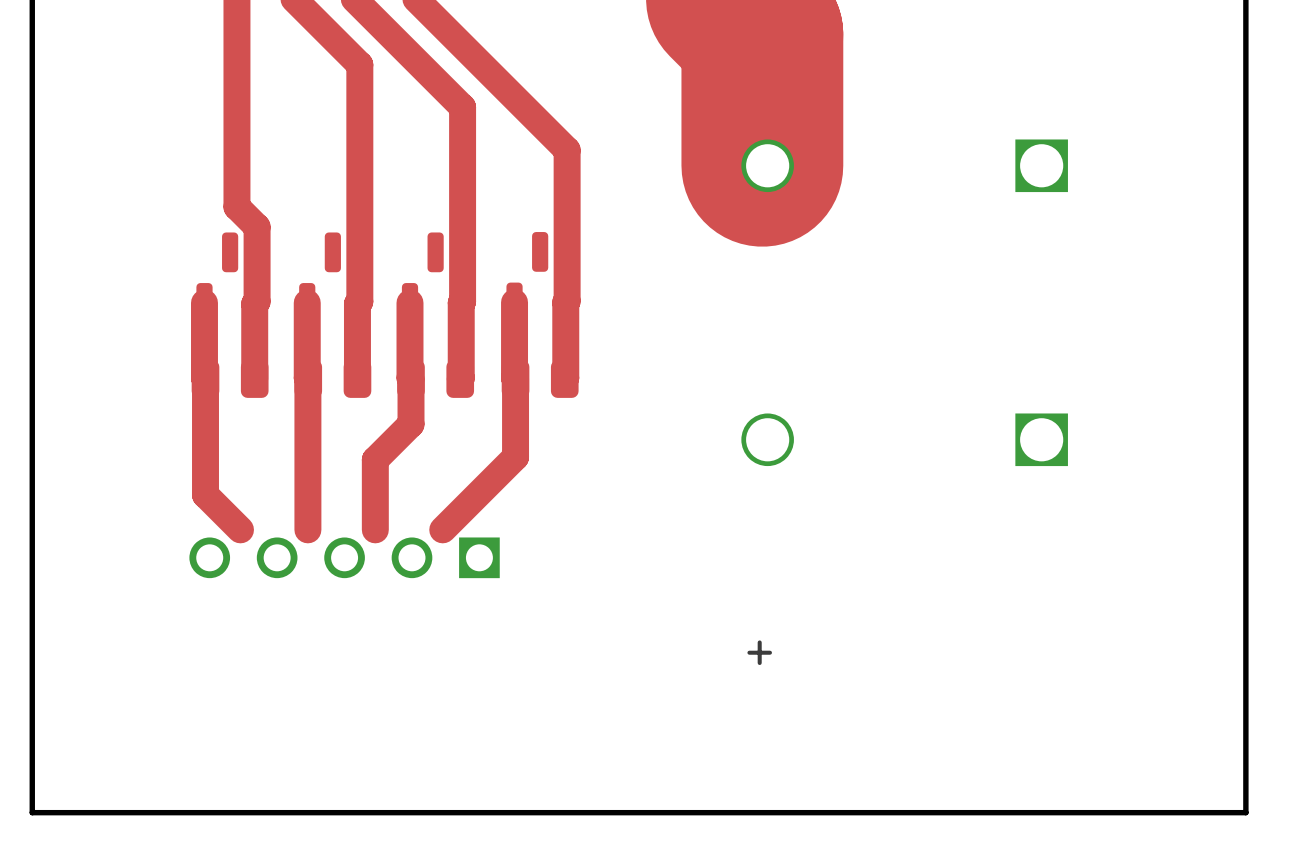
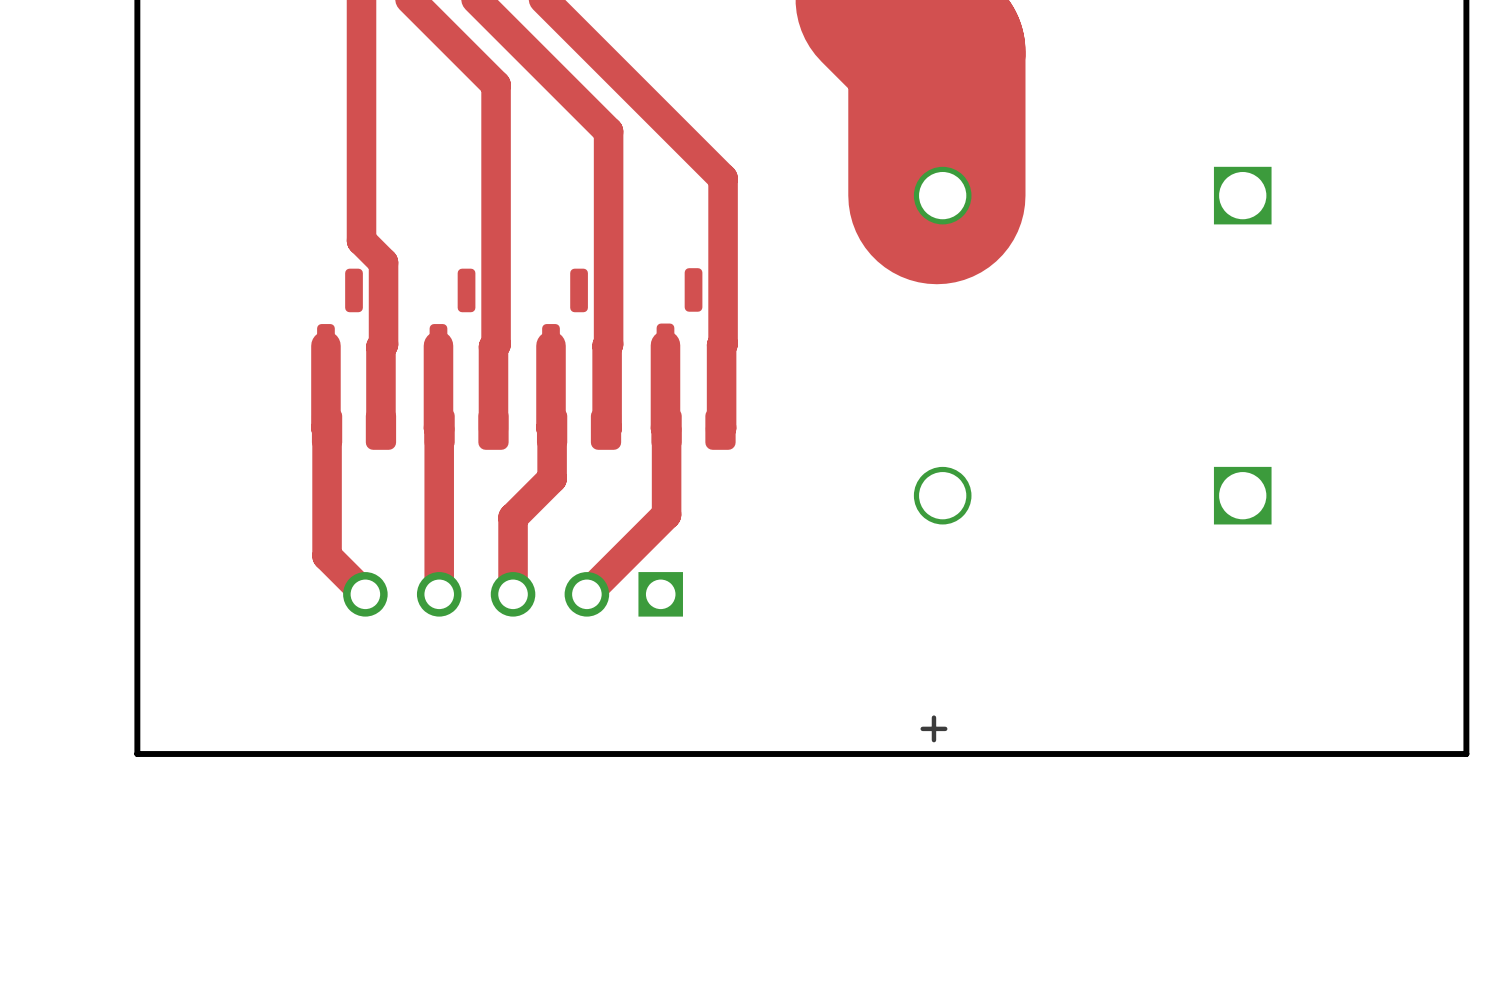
part position: (344, 557) -> (513, 594)
board edge: (1245, 675) (1245, 812) (32, 812) (32, 675) -> (1466, 754) (137, 754)

